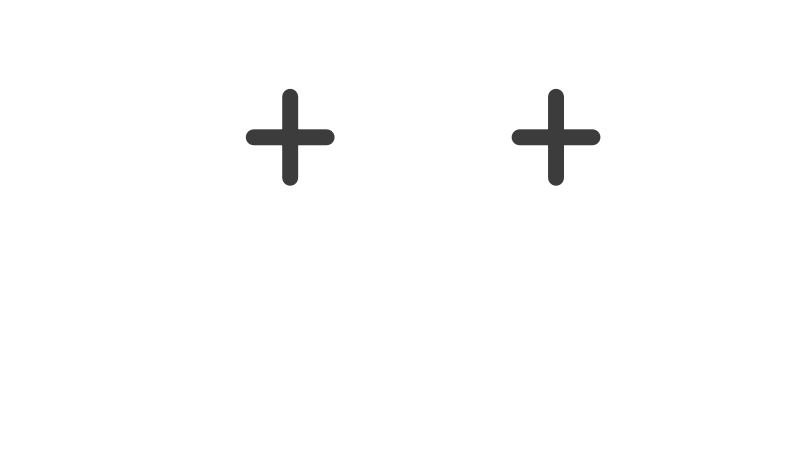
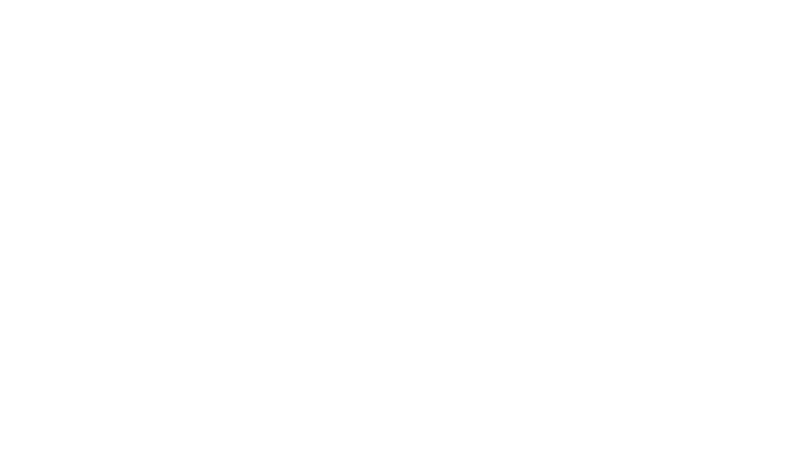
text: + (290, 137) -> none
text: + (556, 137) -> none

